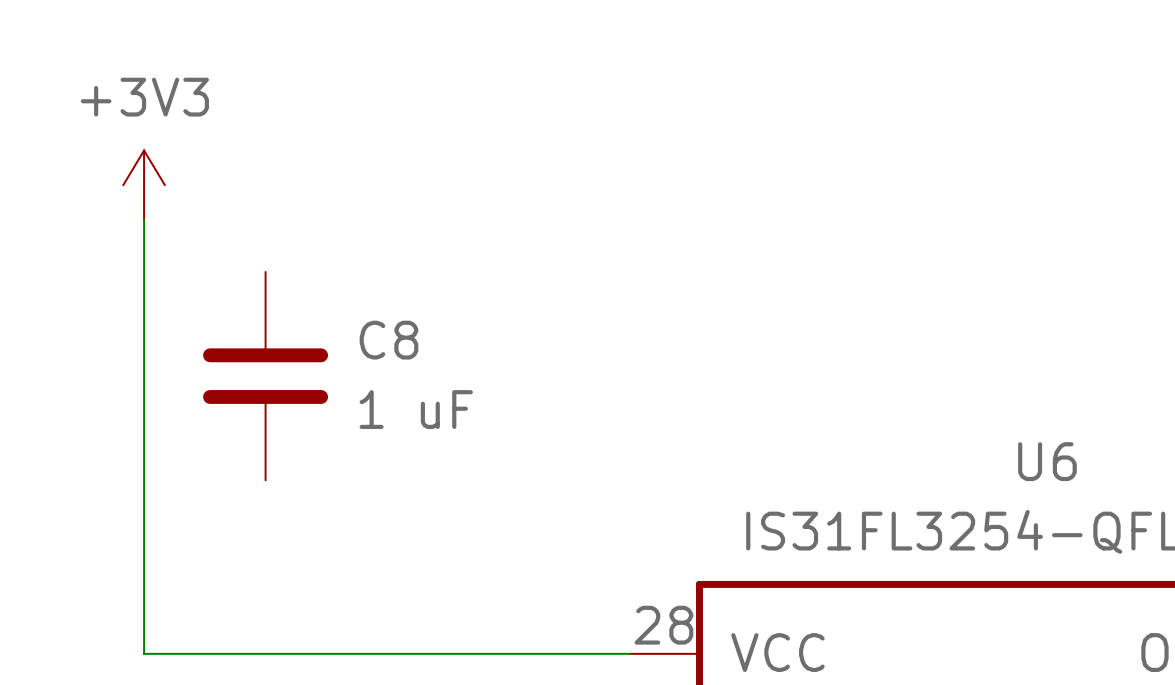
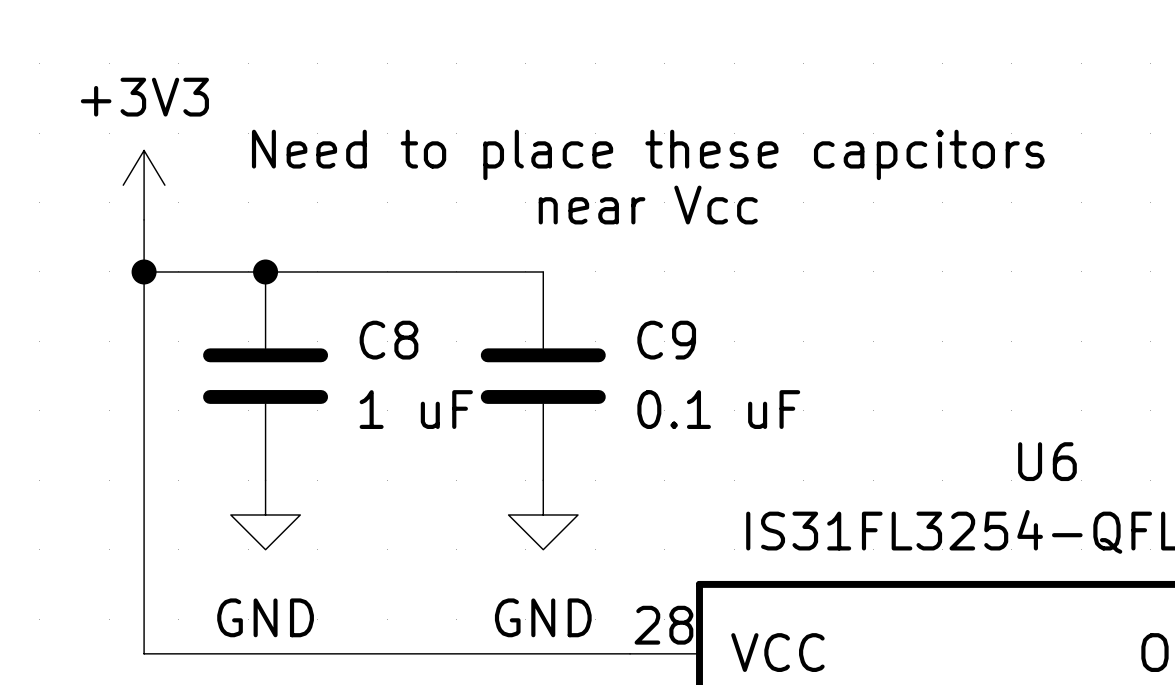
text: none -> Need to place these capcitors (648, 154)
text: none -> near Vcc (648, 205)
wire: none -> (144, 271) (543, 271)
junction: none -> (144, 271)
junction: none -> (265, 271)
C9: none -> 0.1 uF (543, 376)
power symbol: none -> GND (265, 514)
power symbol: none -> GND (543, 514)

